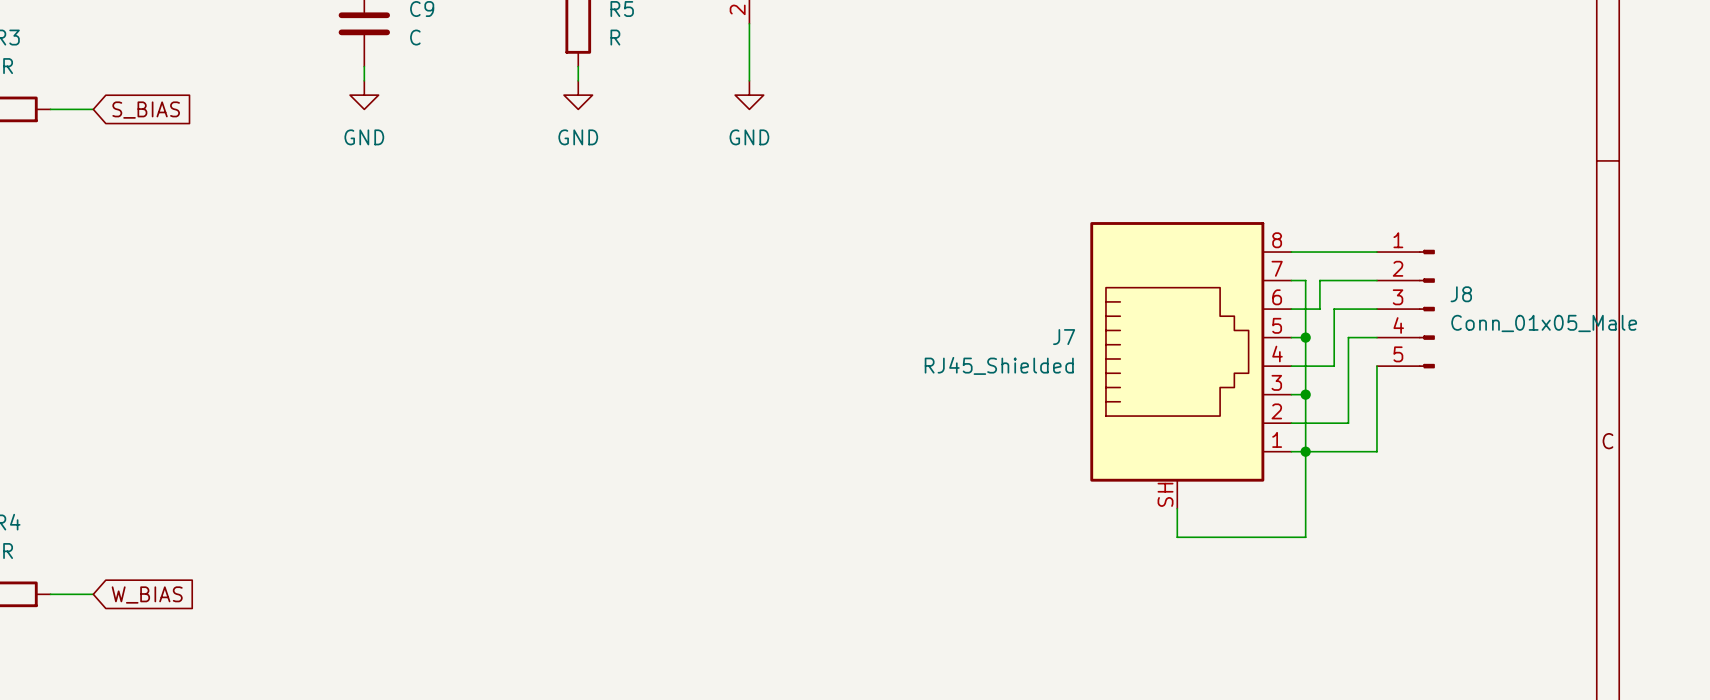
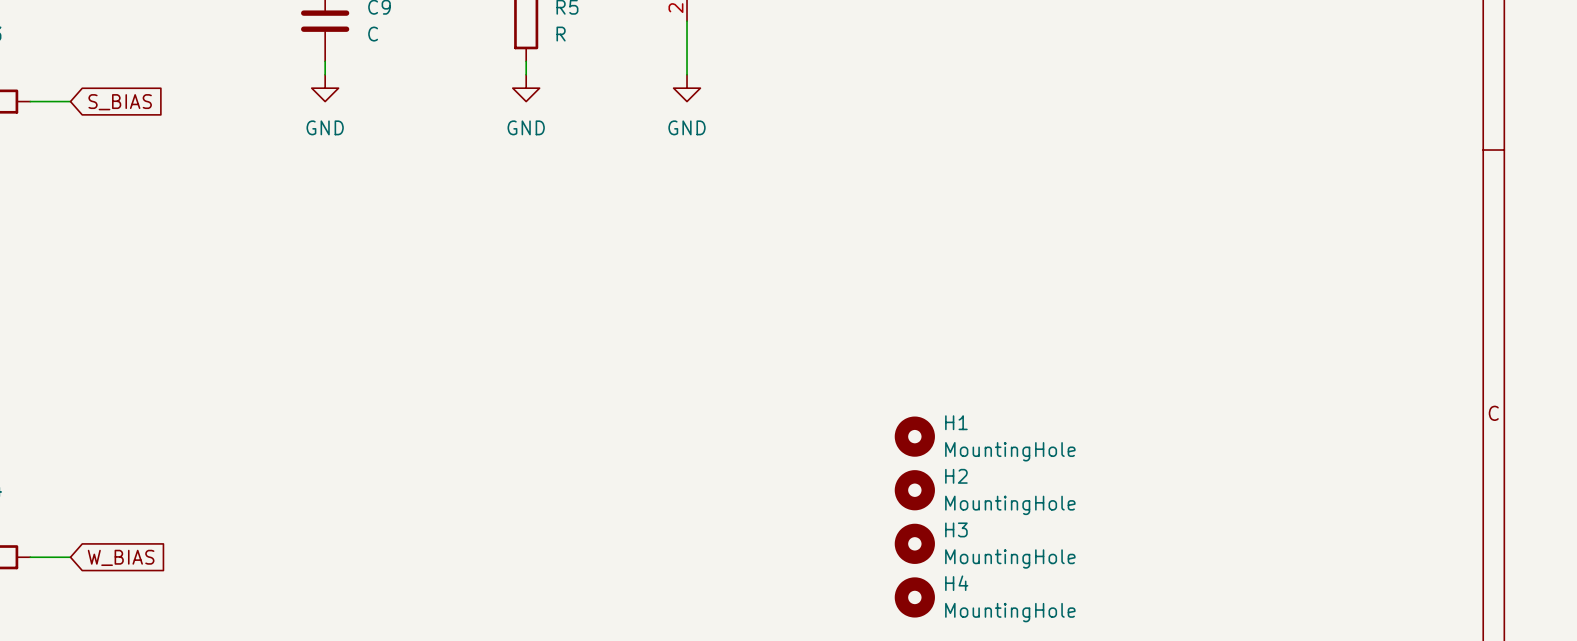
wire: (1291, 252) (1376, 252) -> none
wire: (1291, 280) (1305, 280) (1305, 537) (1177, 537) (1177, 508) -> none
wire: (1376, 280) (1319, 280) (1319, 309) (1291, 309) -> none
wire: (1376, 309) (1334, 309) (1334, 366) (1291, 366) -> none
J8: Conn_01x05_Male (1405, 309) -> none
wire: (1291, 337) (1305, 337) -> none
junction: (1305, 337) -> none
wire: (1376, 337) (1348, 337) (1348, 423) (1291, 423) -> none
J7: RJ45_Shielded (1190, 365) -> none
wire: (1376, 366) (1376, 451) (1291, 451) -> none
wire: (1291, 394) (1305, 394) -> none
junction: (1305, 394) -> none
junction: (1305, 451) -> none
H1: none -> MountingHole (914, 436)
H2: none -> MountingHole (914, 490)
H3: none -> MountingHole (914, 543)
H4: none -> MountingHole (914, 597)

